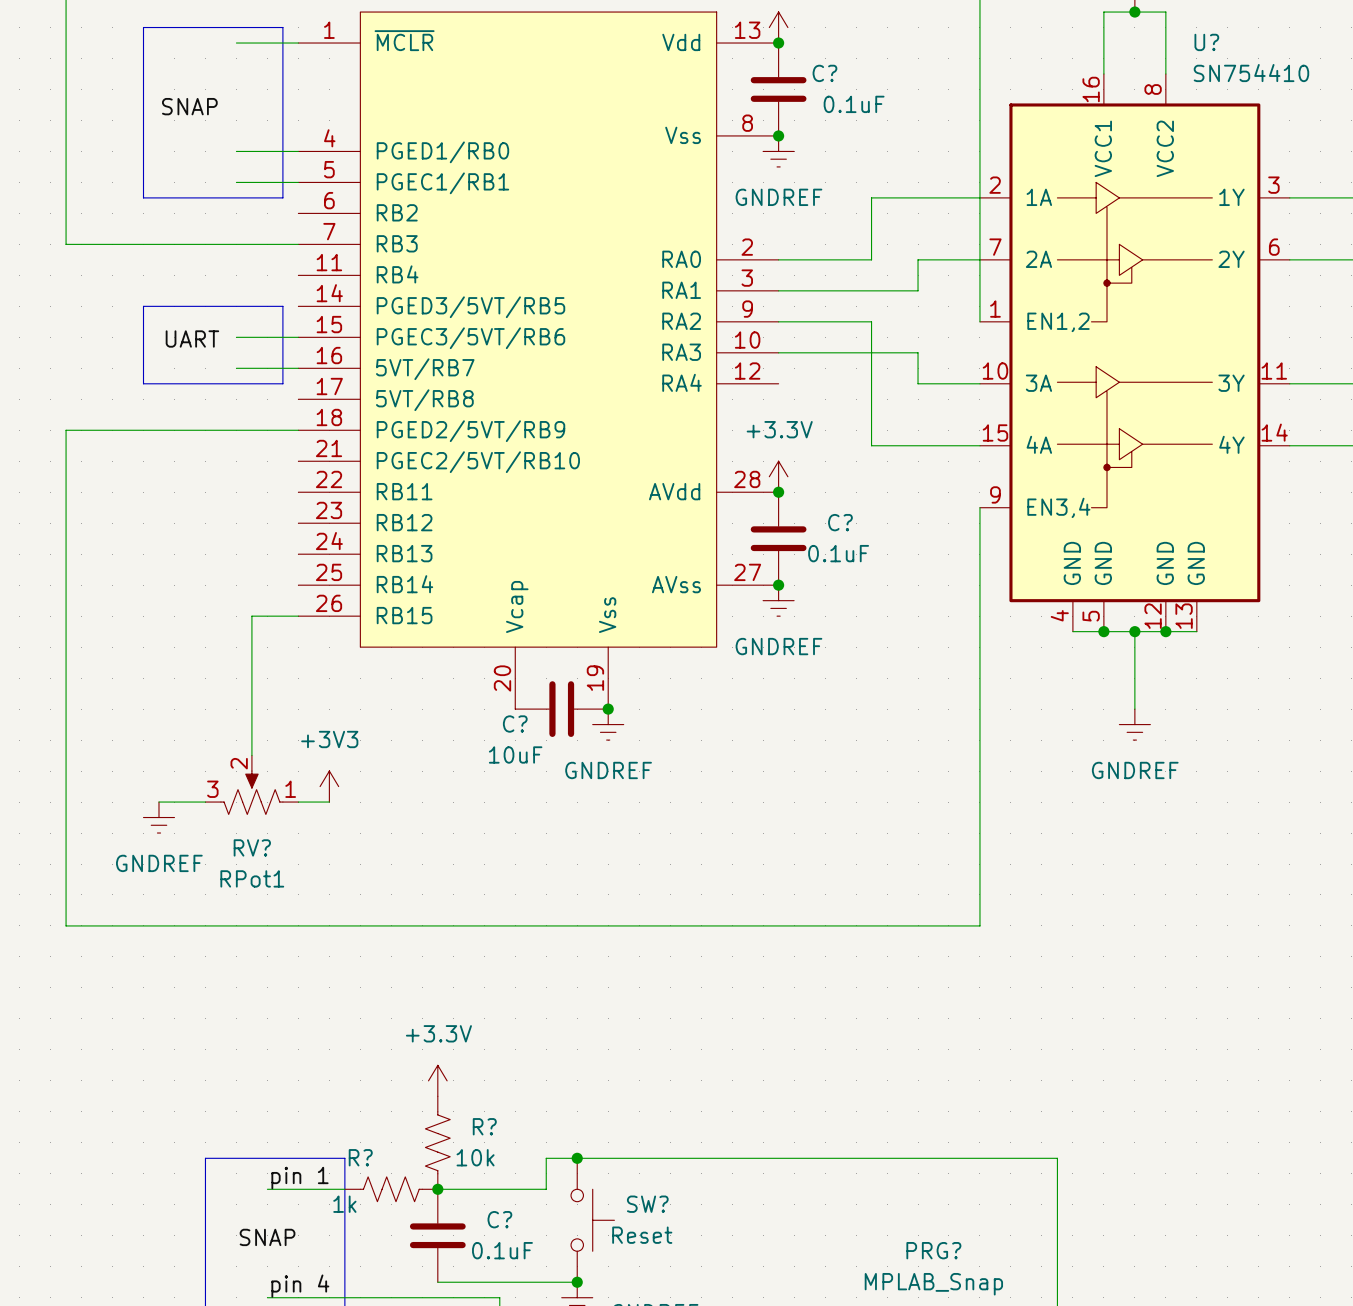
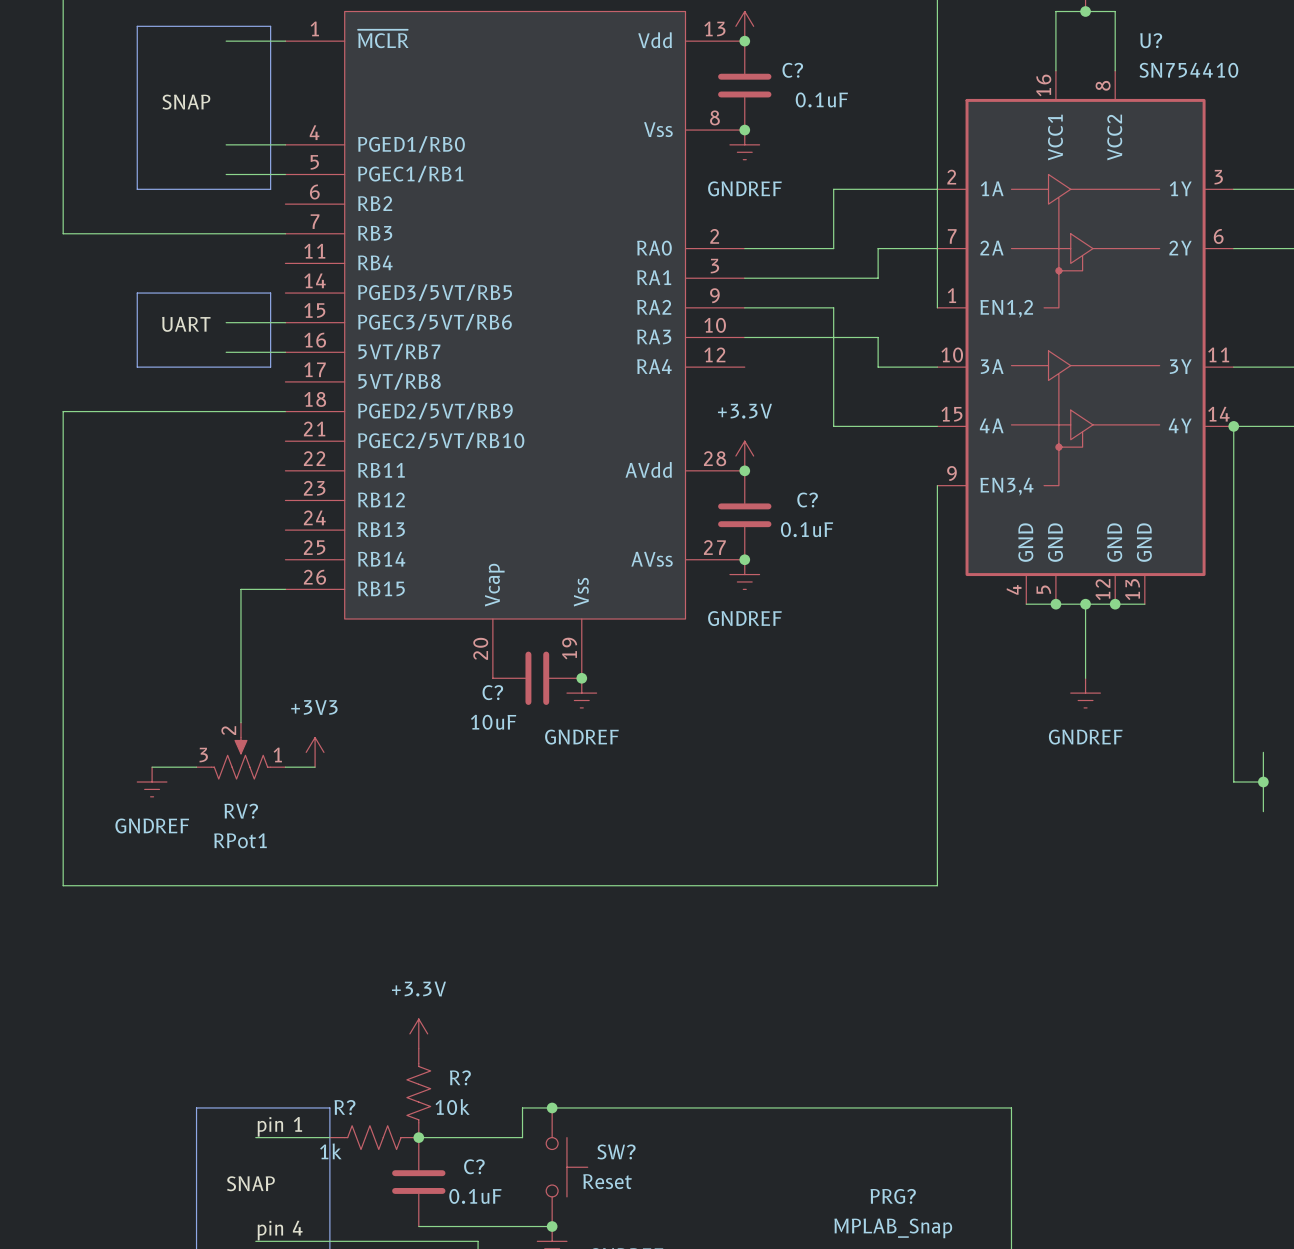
wire: none -> (1233, 426) (1233, 782) (1263, 782)
junction: none -> (1233, 426)
wire: none -> (1263, 752) (1263, 811)
junction: none -> (1263, 782)

